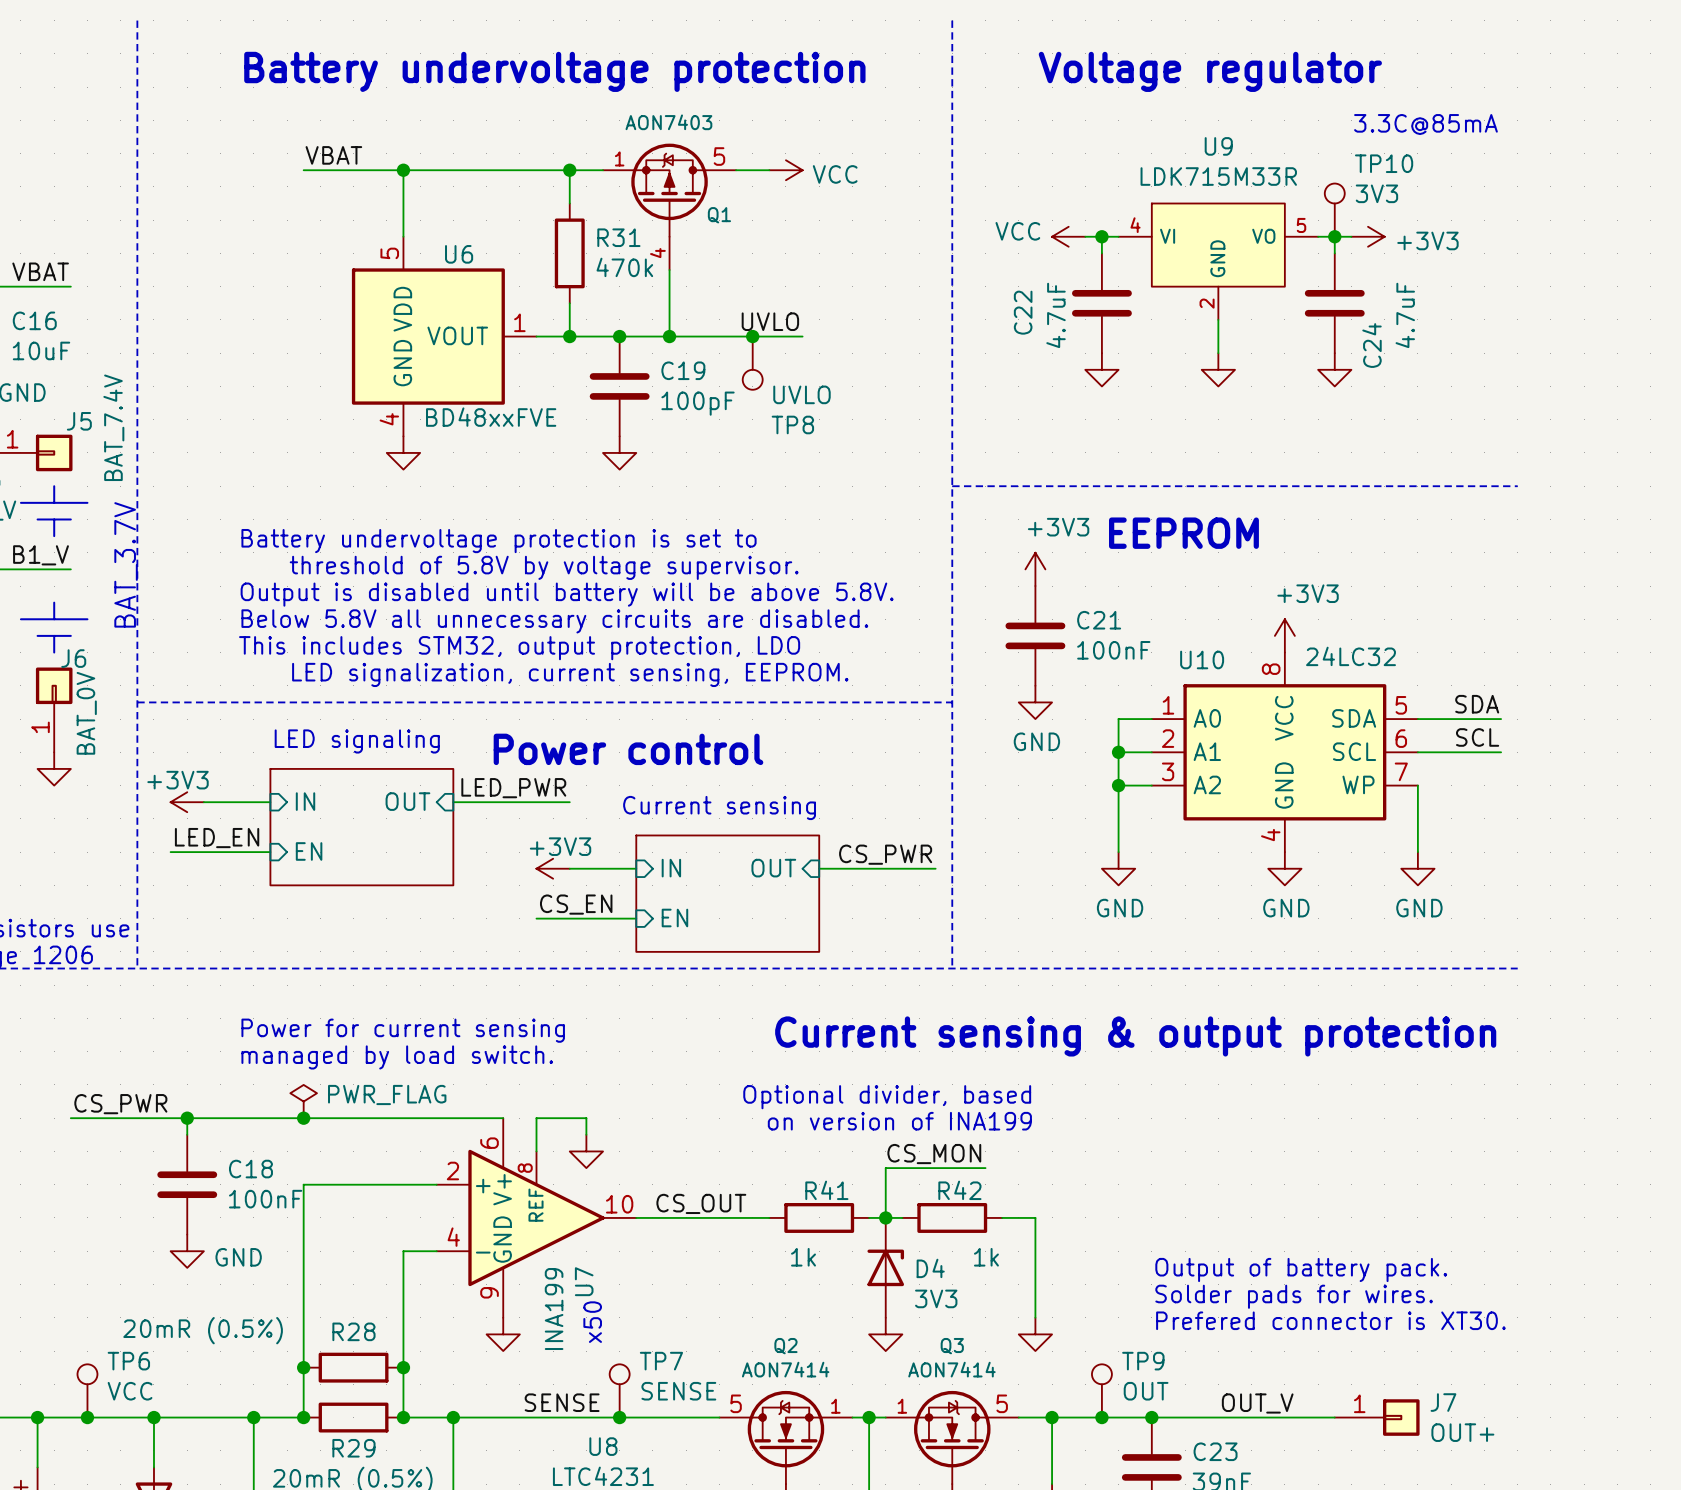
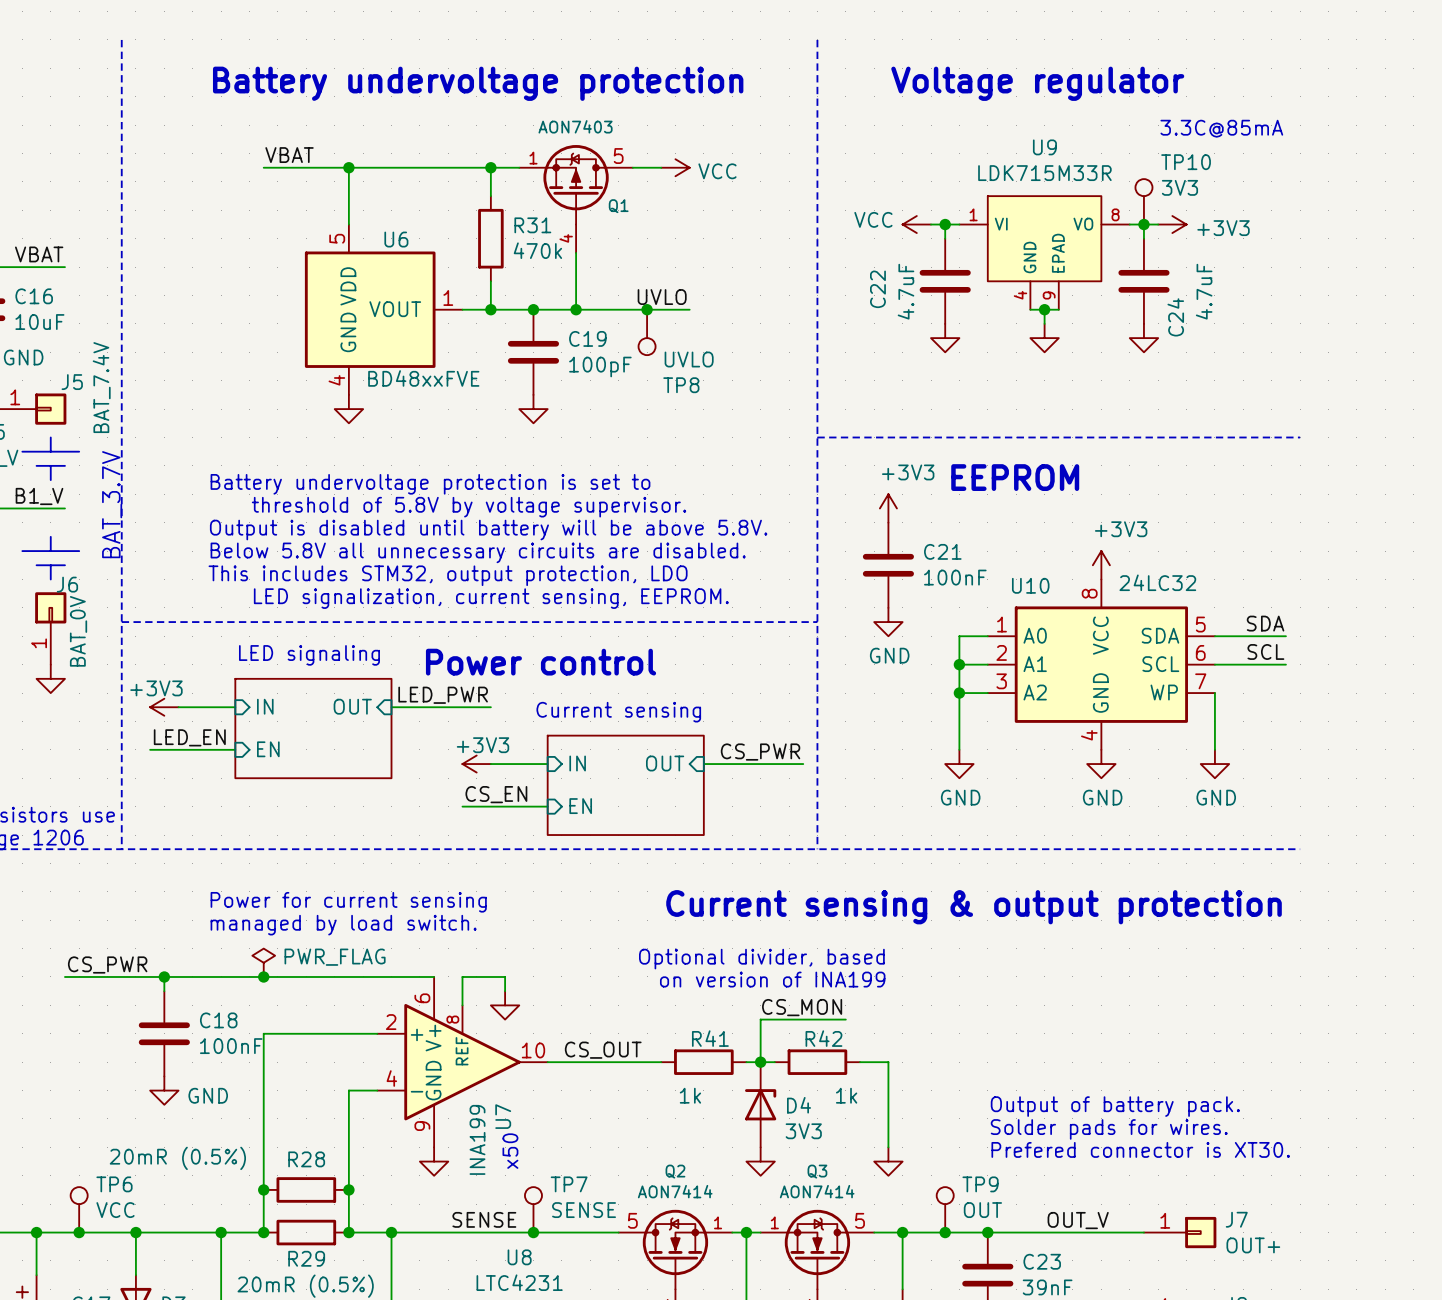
U9 symbol: [1118, 203, 1319, 320] -> [959, 196, 1130, 310]
wire: none -> (1030, 309) (1058, 309)
junction: none -> (1044, 309)

